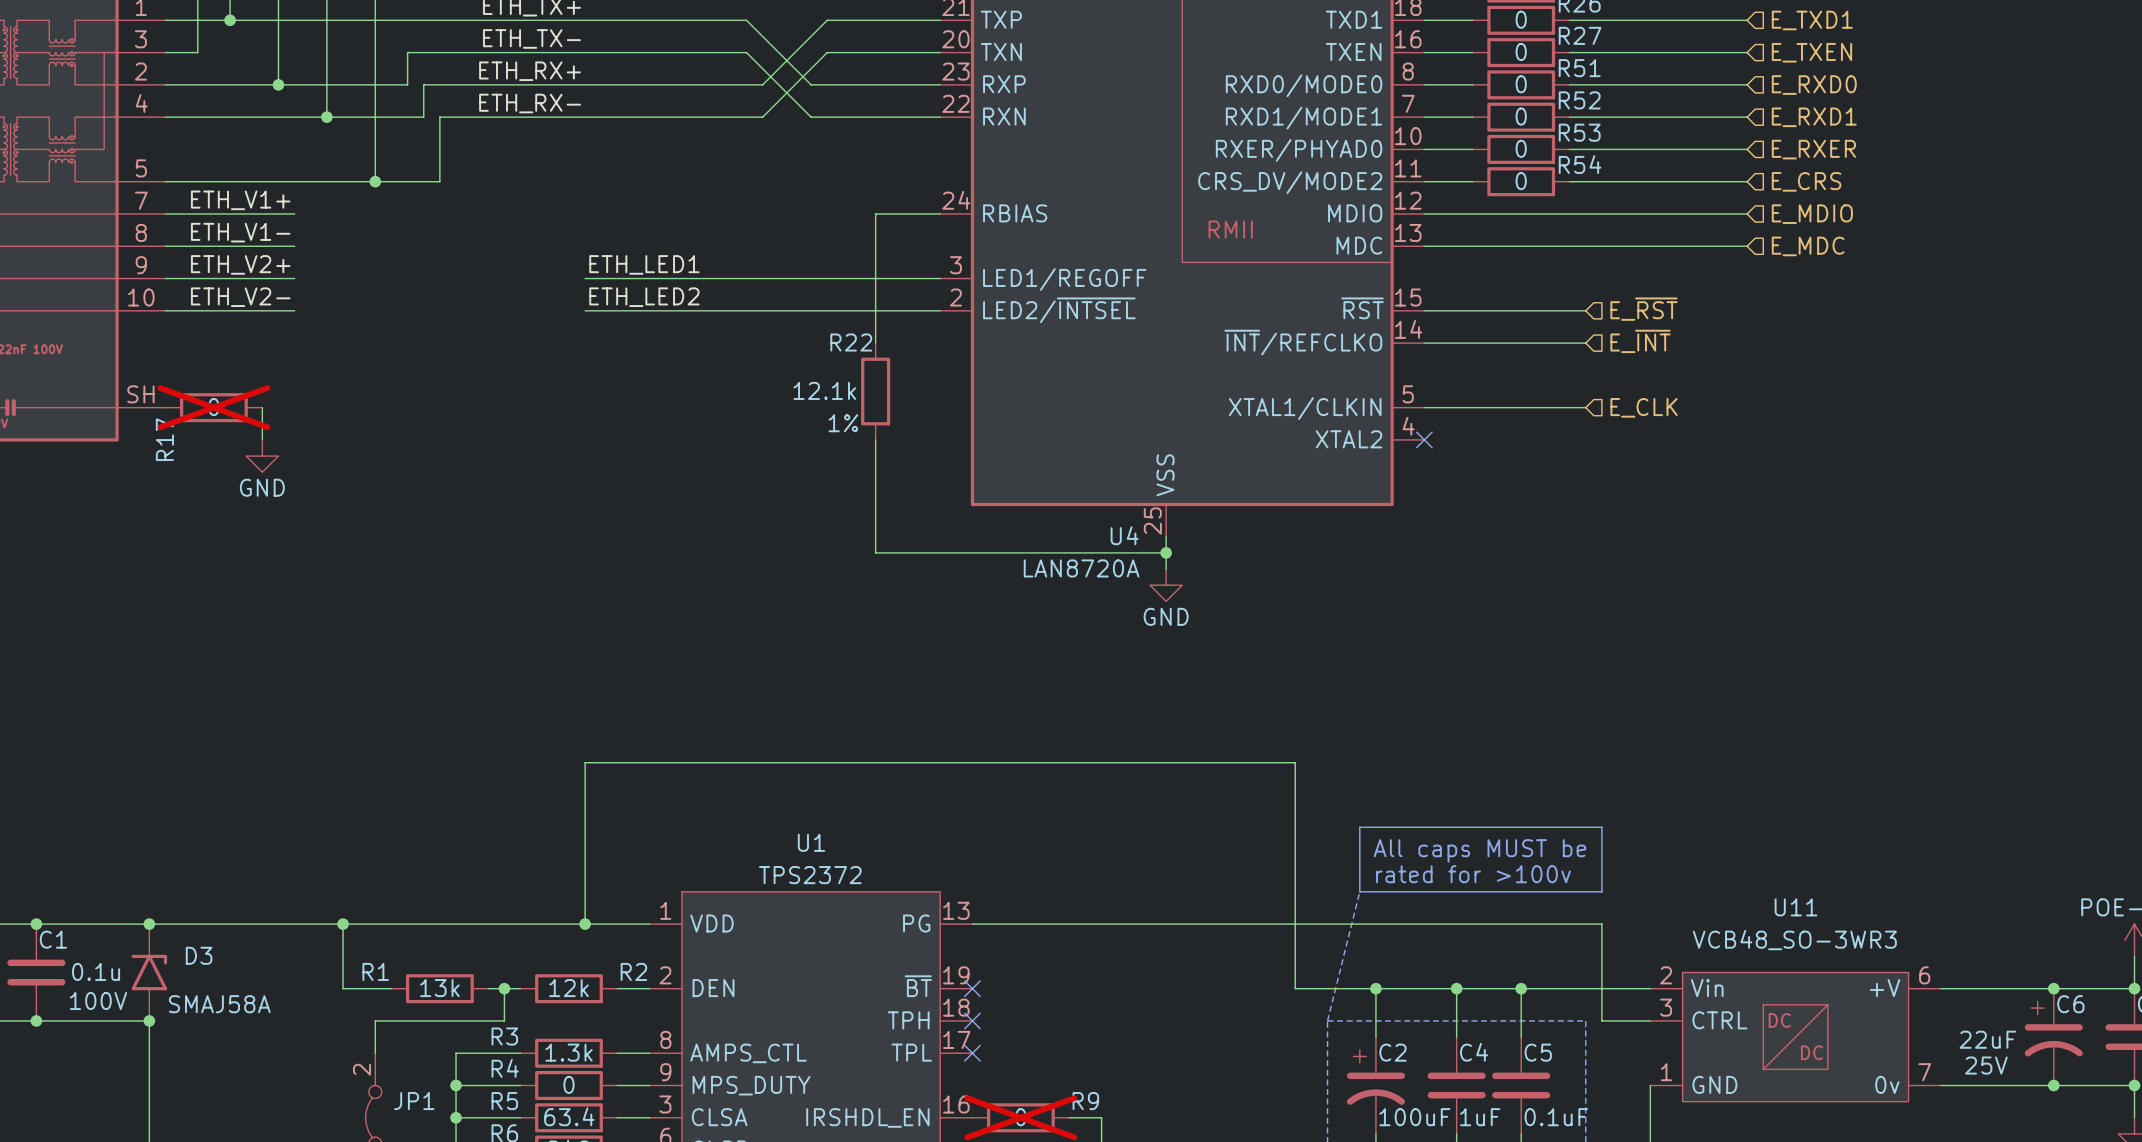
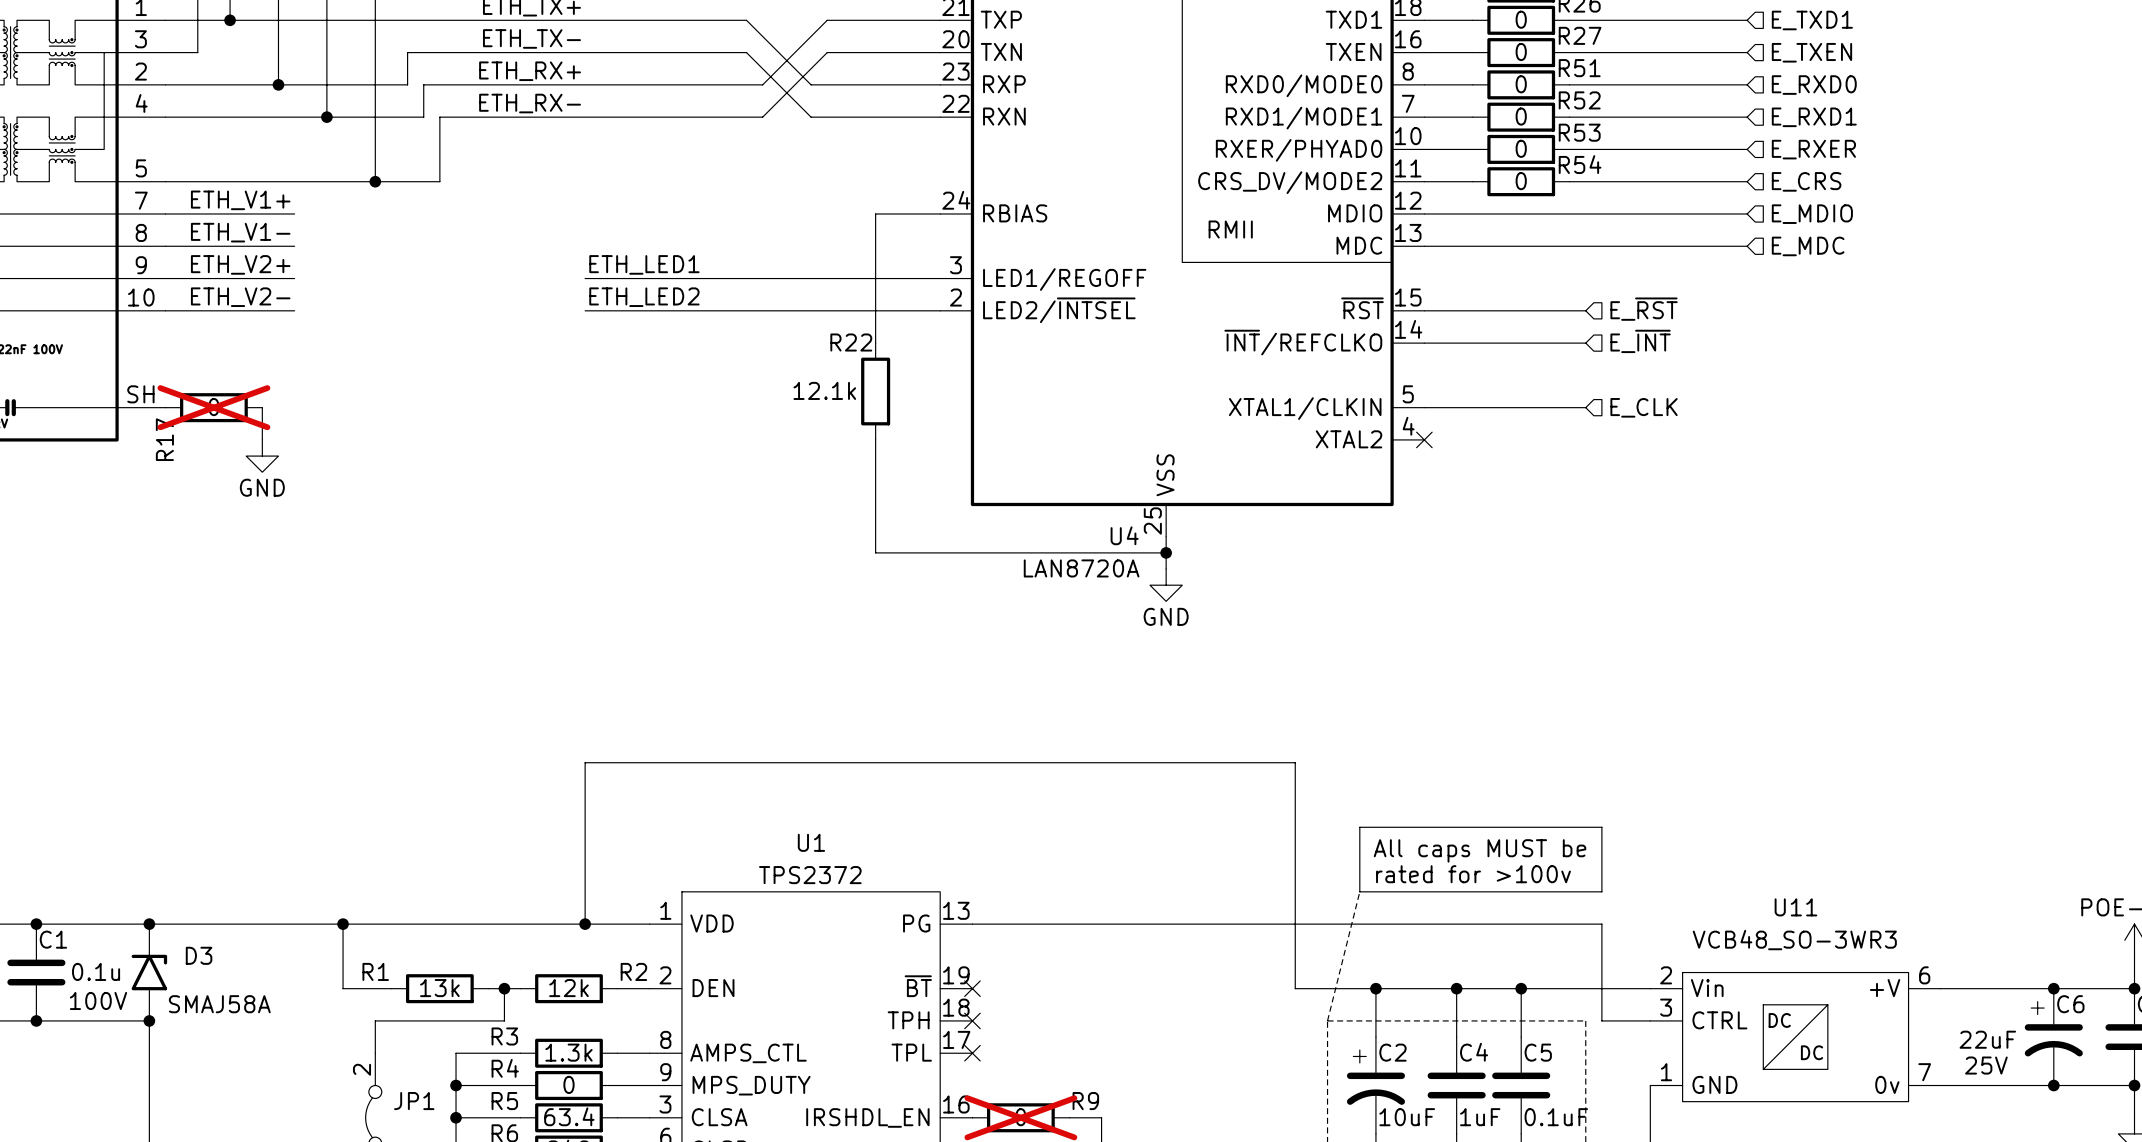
R22 text: 1% (843, 423) -> none
C2 value: 100uF (1414, 1117) -> 10uF (1407, 1117)

